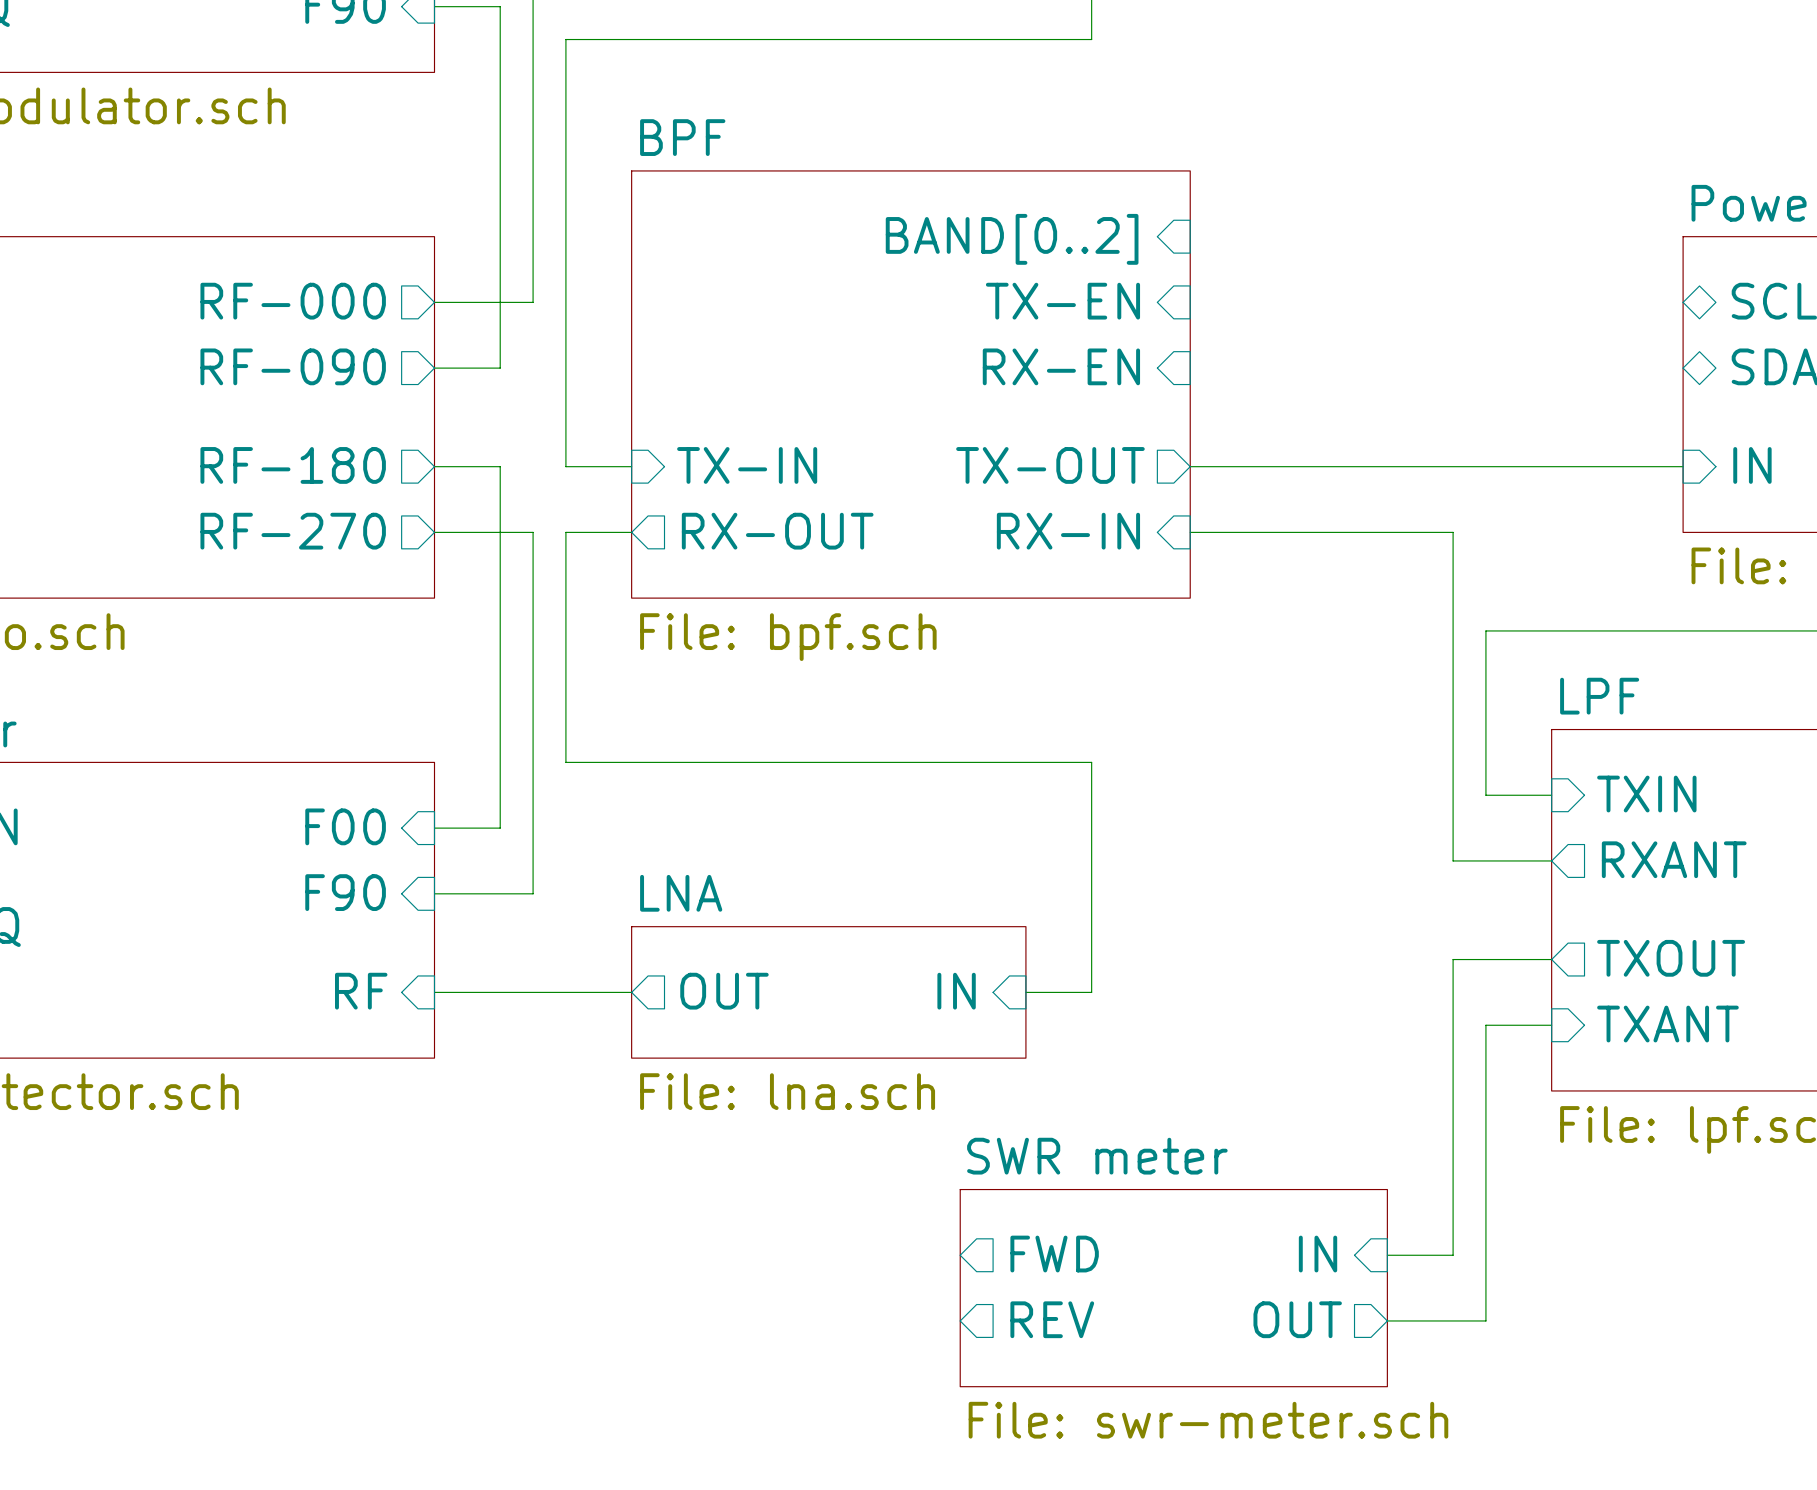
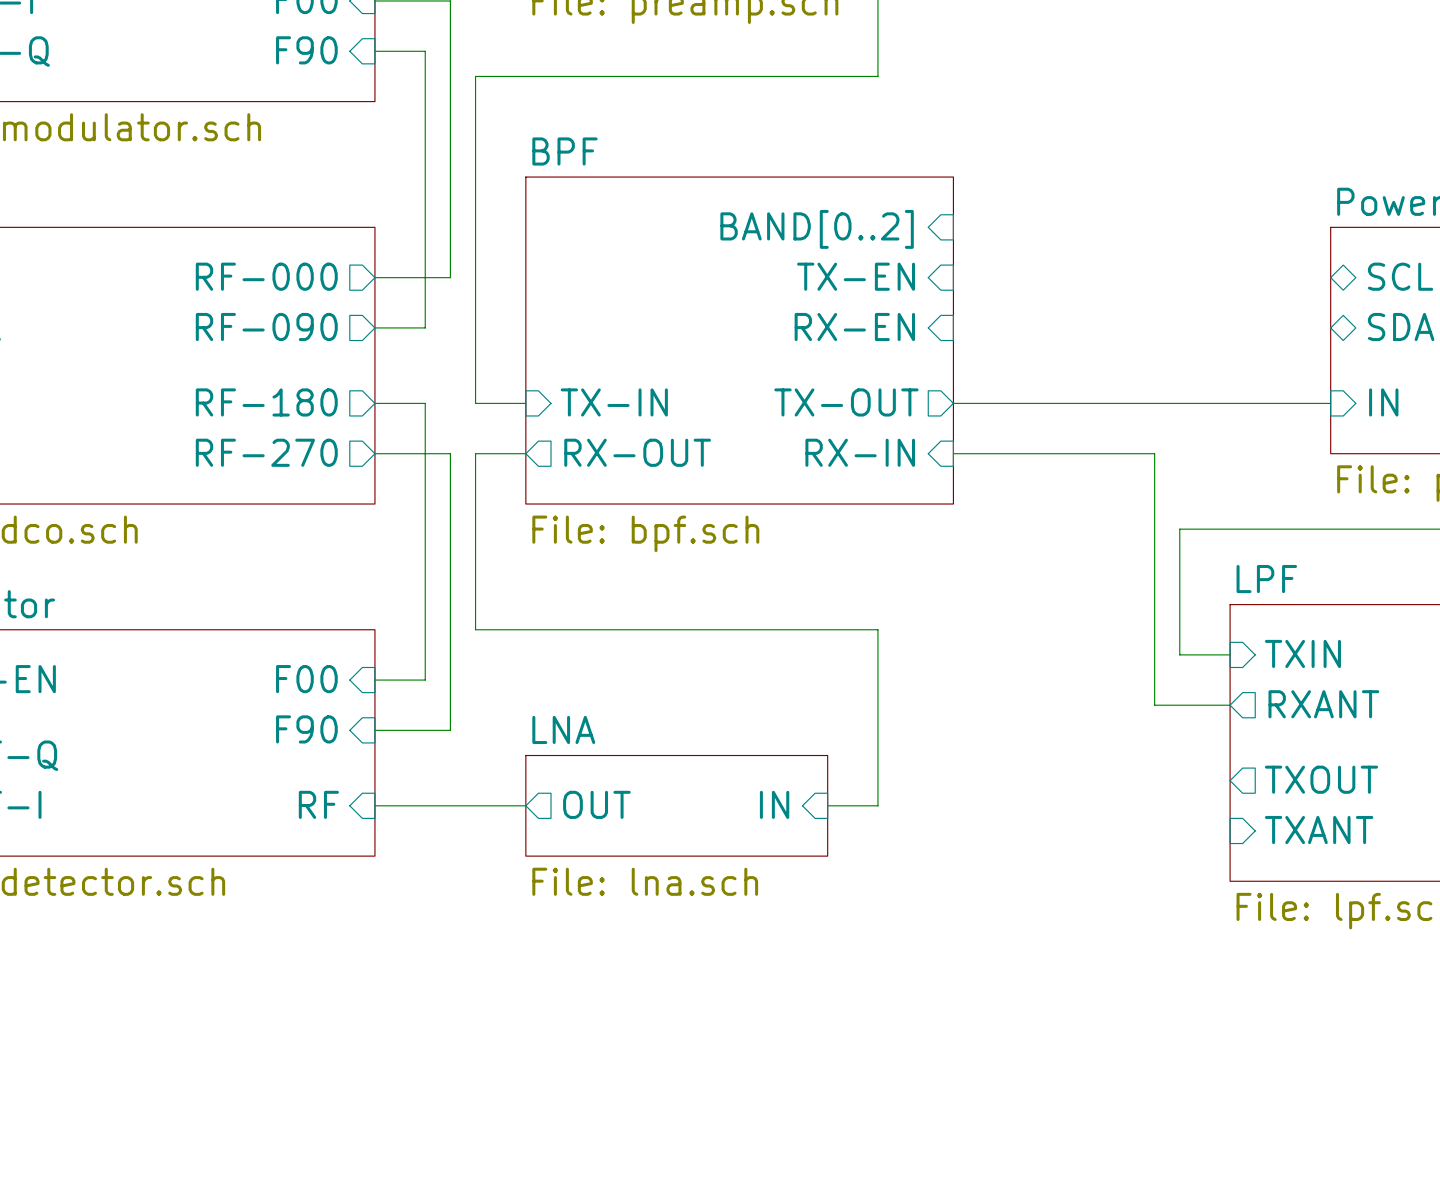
wire: (1551, 959) (1453, 959) (1453, 1255) (1387, 1255) -> none
wire: (1551, 1025) (1485, 1025) (1485, 1320) (1387, 1320) -> none
sheet pin: FWD (1054, 1254) -> none
sheet pin: IN (1318, 1254) -> none
sheet SWR meter: File: swr-meter.sch (1173, 1288) -> none
sheet pin: REV (1052, 1319) -> none
sheet pin: OUT (1297, 1319) -> none

